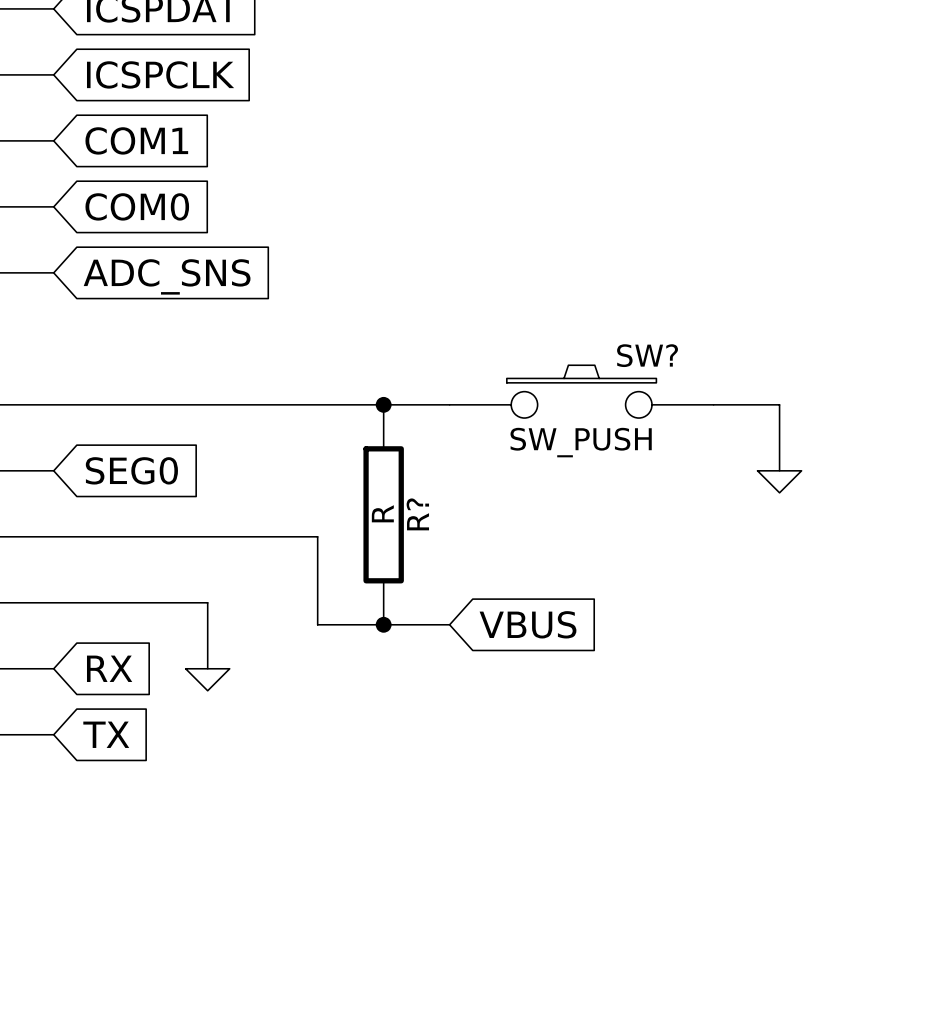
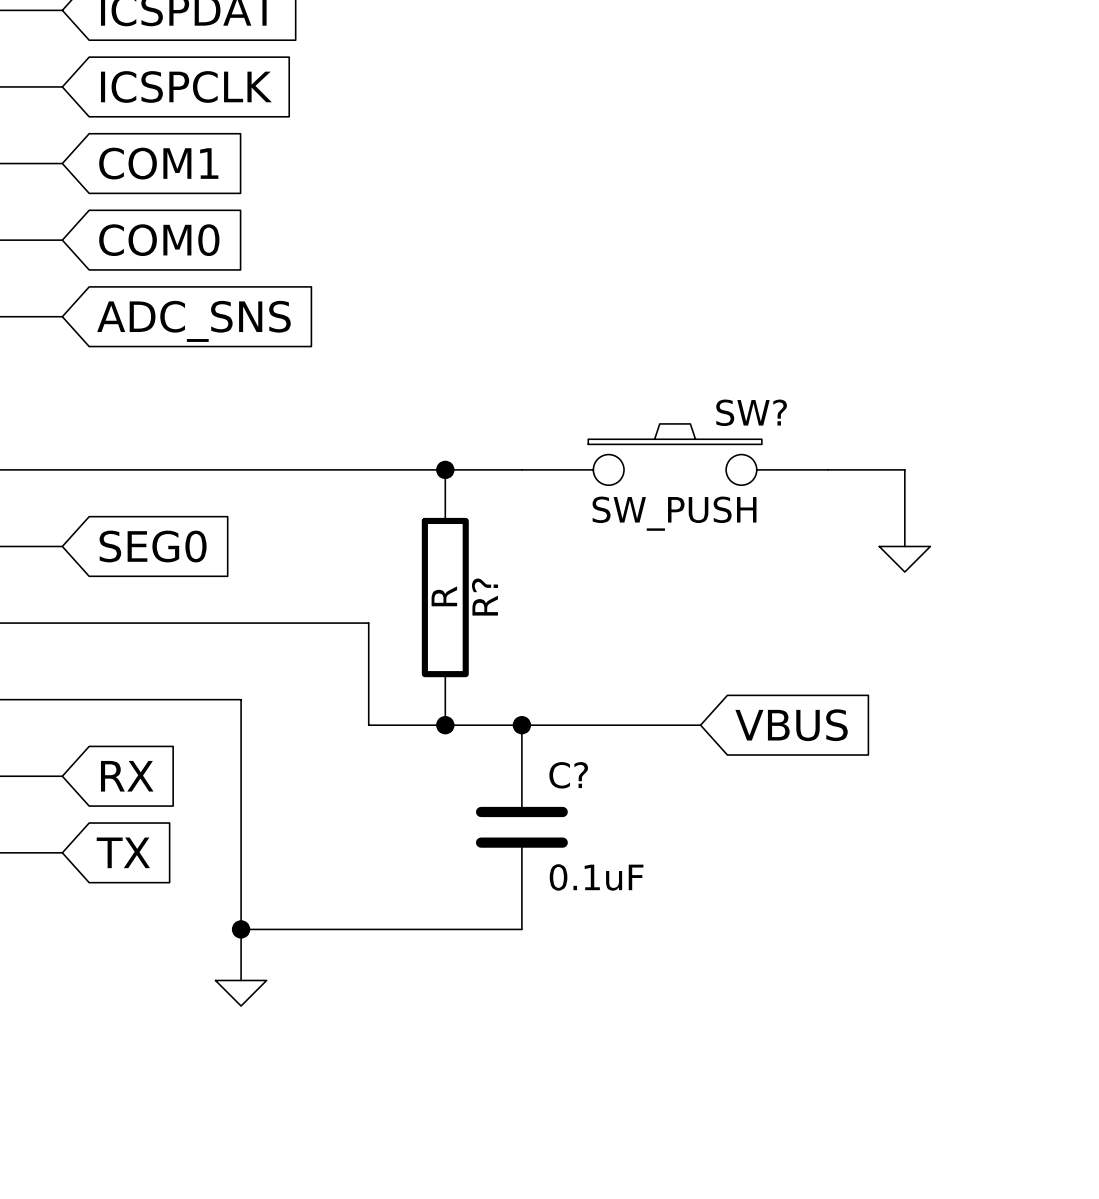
wire: none -> (521, 725) (700, 725)
junction: none -> (521, 725)
global label position: VBUS (528, 624) -> VBUS (791, 725)
wire: none -> (241, 776) (241, 980)
power symbol position: (207, 679) -> (241, 993)
C?: none -> 0.1uF (521, 827)
wire: none -> (241, 929) (521, 929)
junction: none -> (241, 929)

